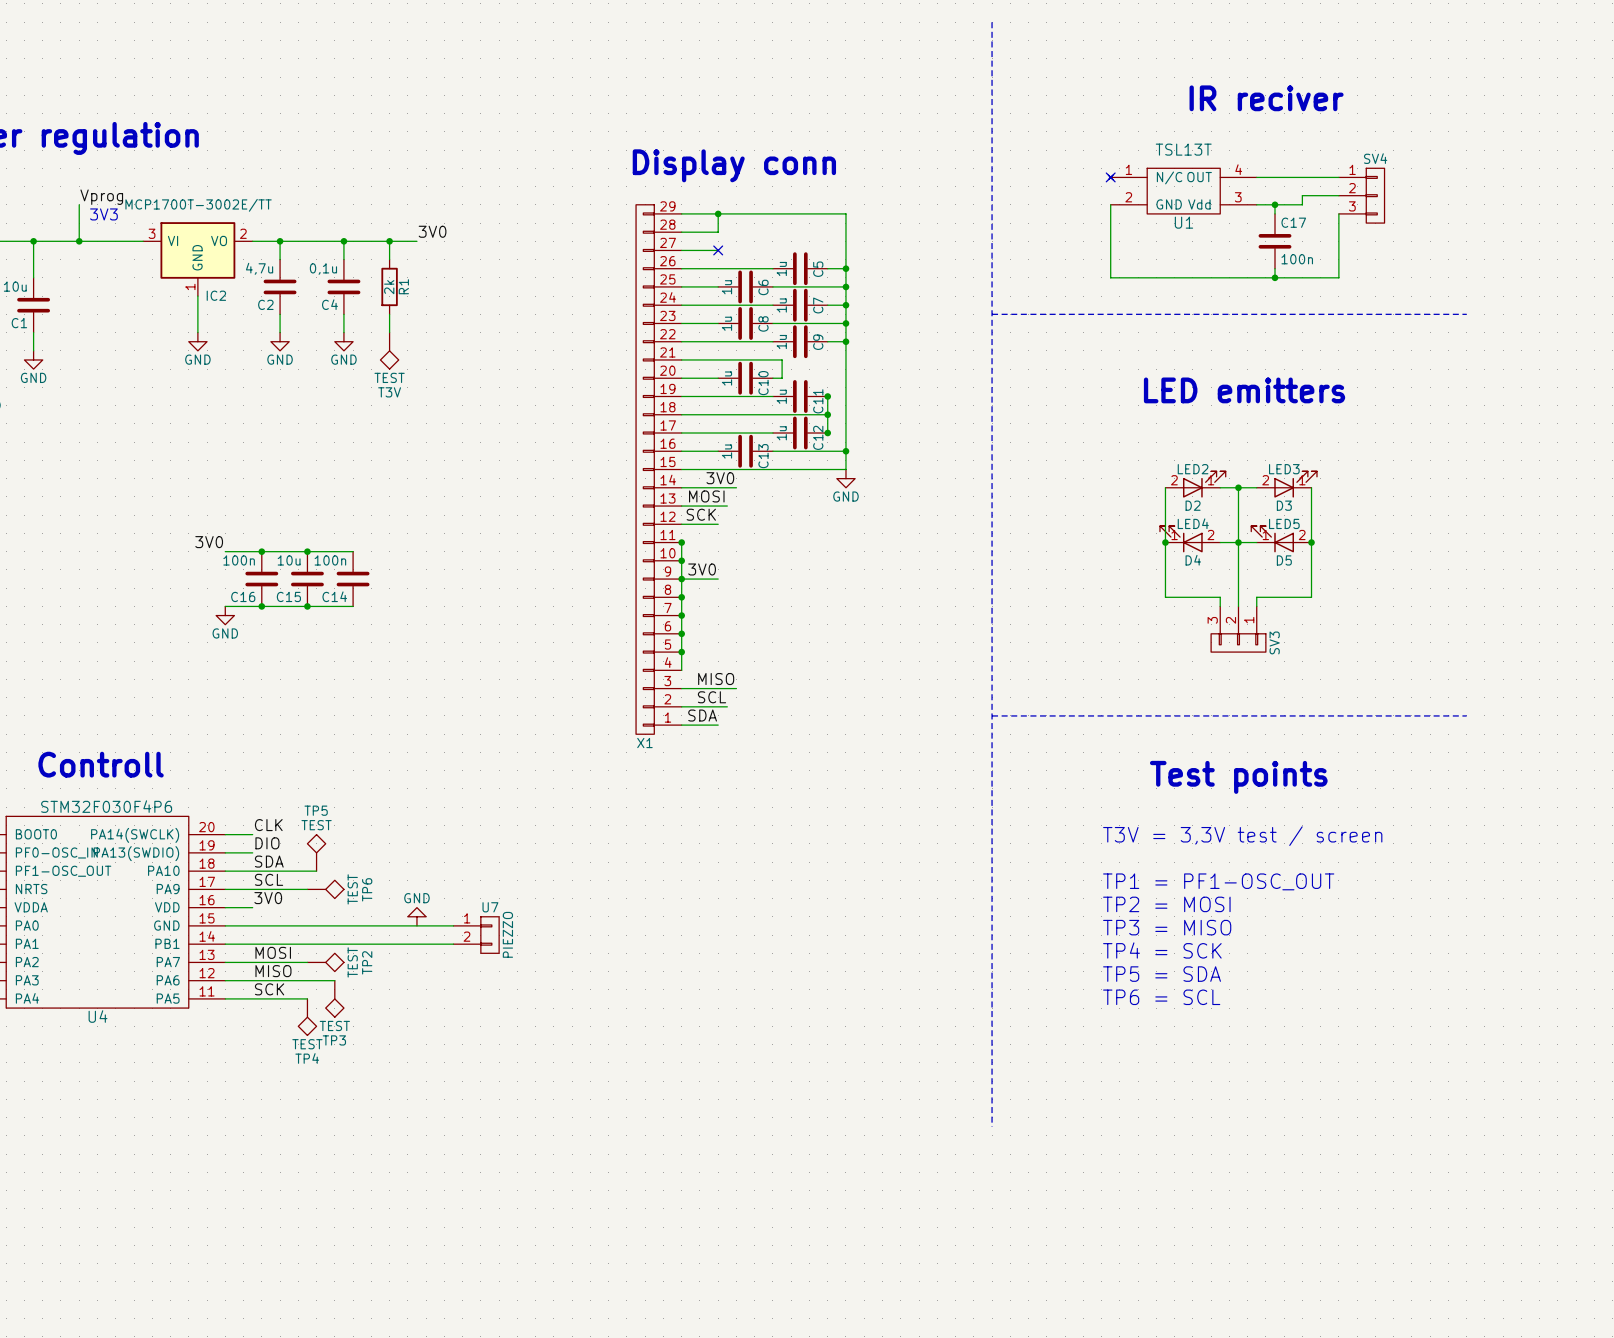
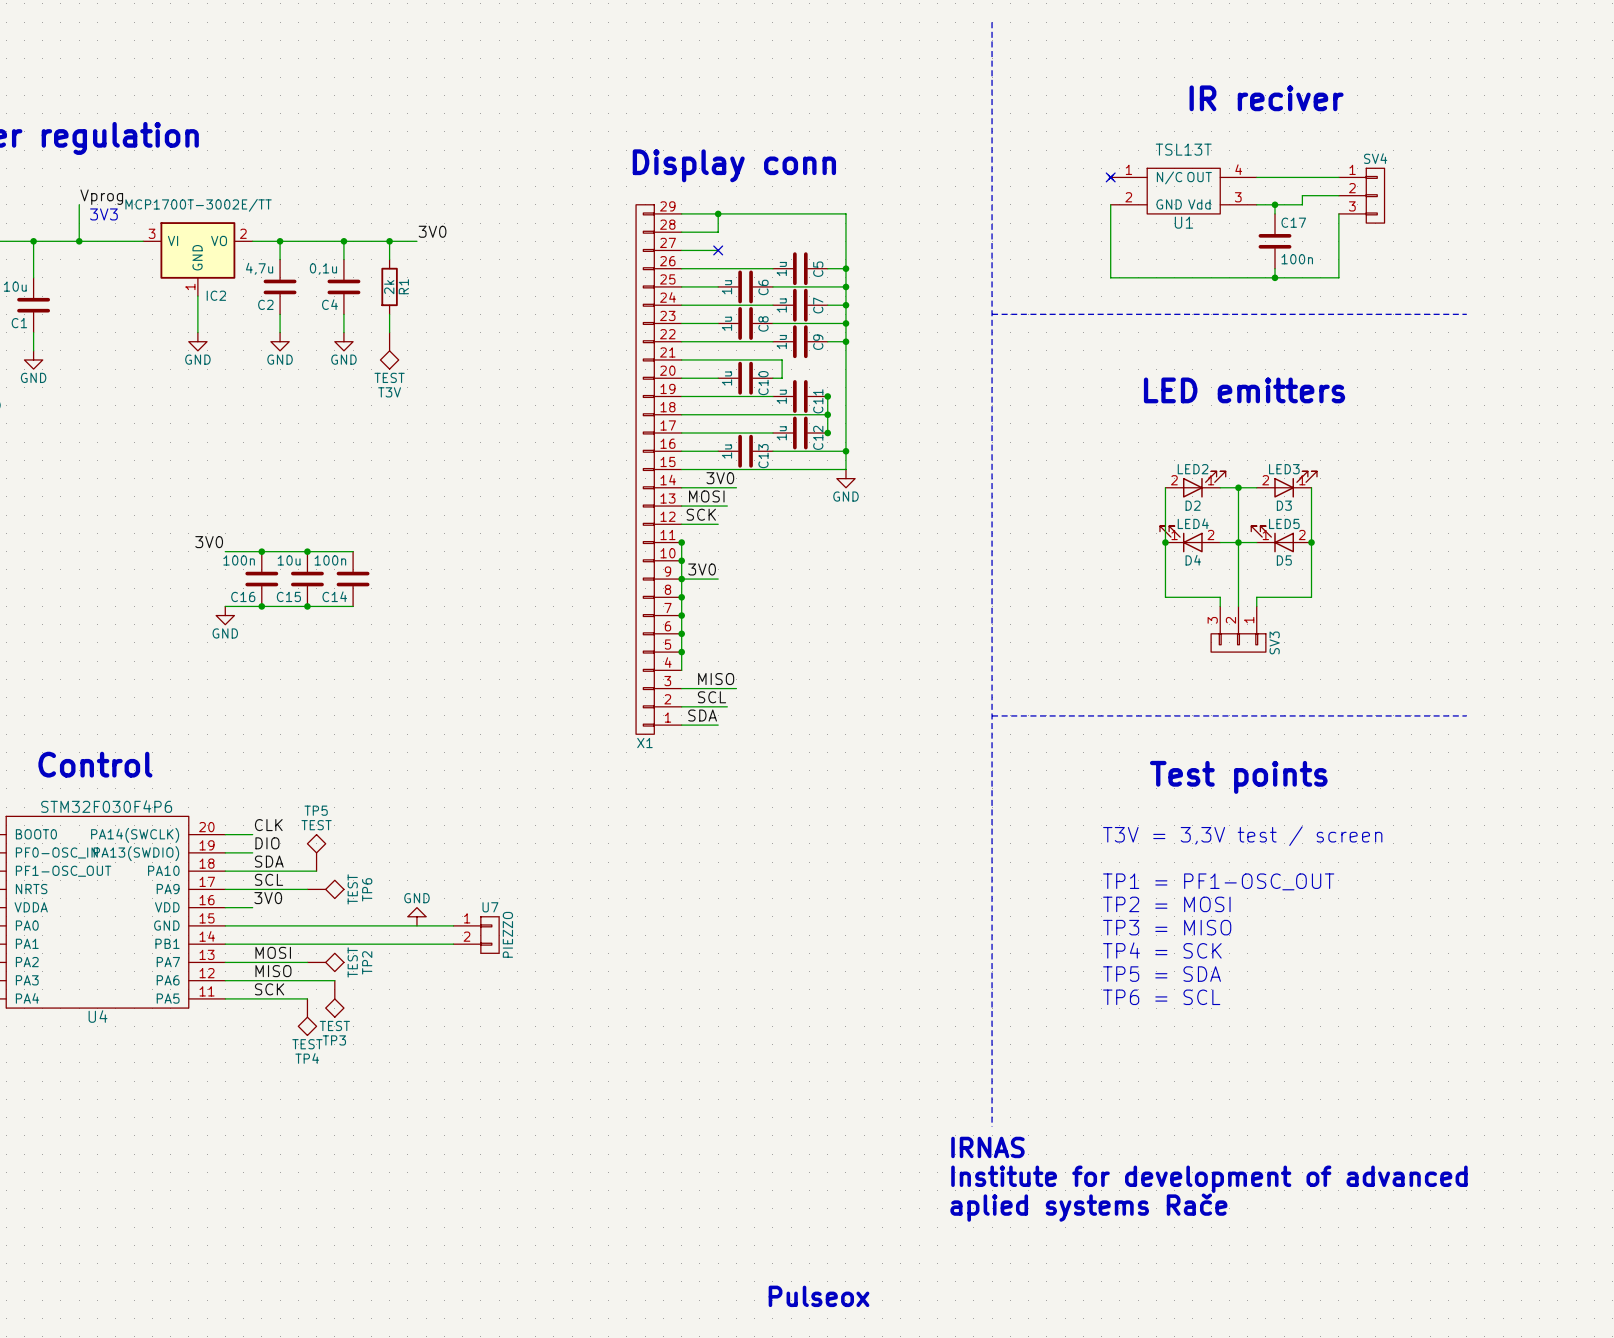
text: Controll (101, 764) -> Control (95, 764)
text: none -> IRNAS (987, 1147)
text: none -> Institute for development of advanced (1209, 1179)
text: none -> aplied systems Rače (1088, 1207)
text: none -> Pulseox (819, 1296)

